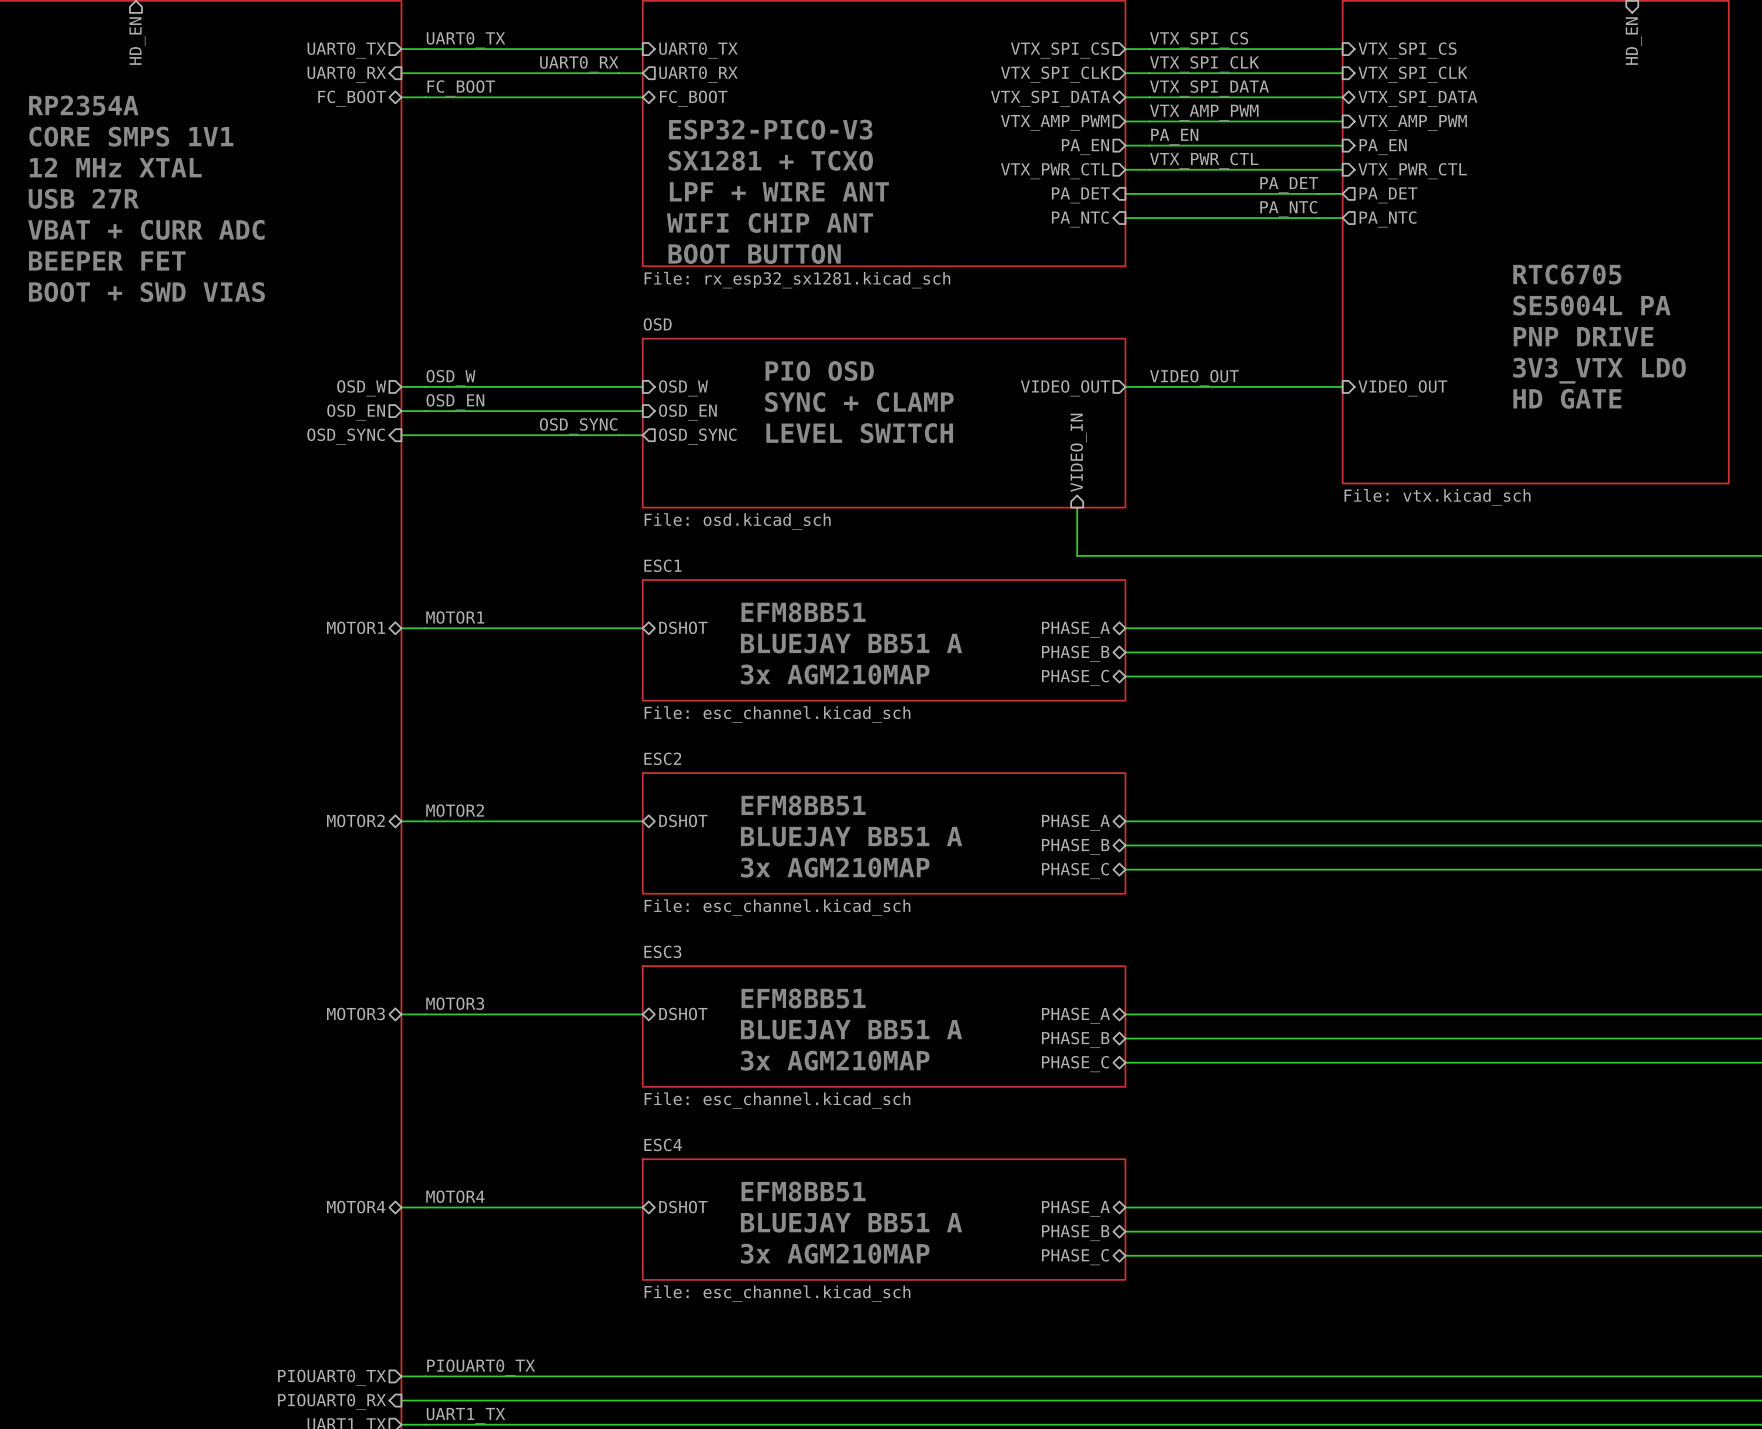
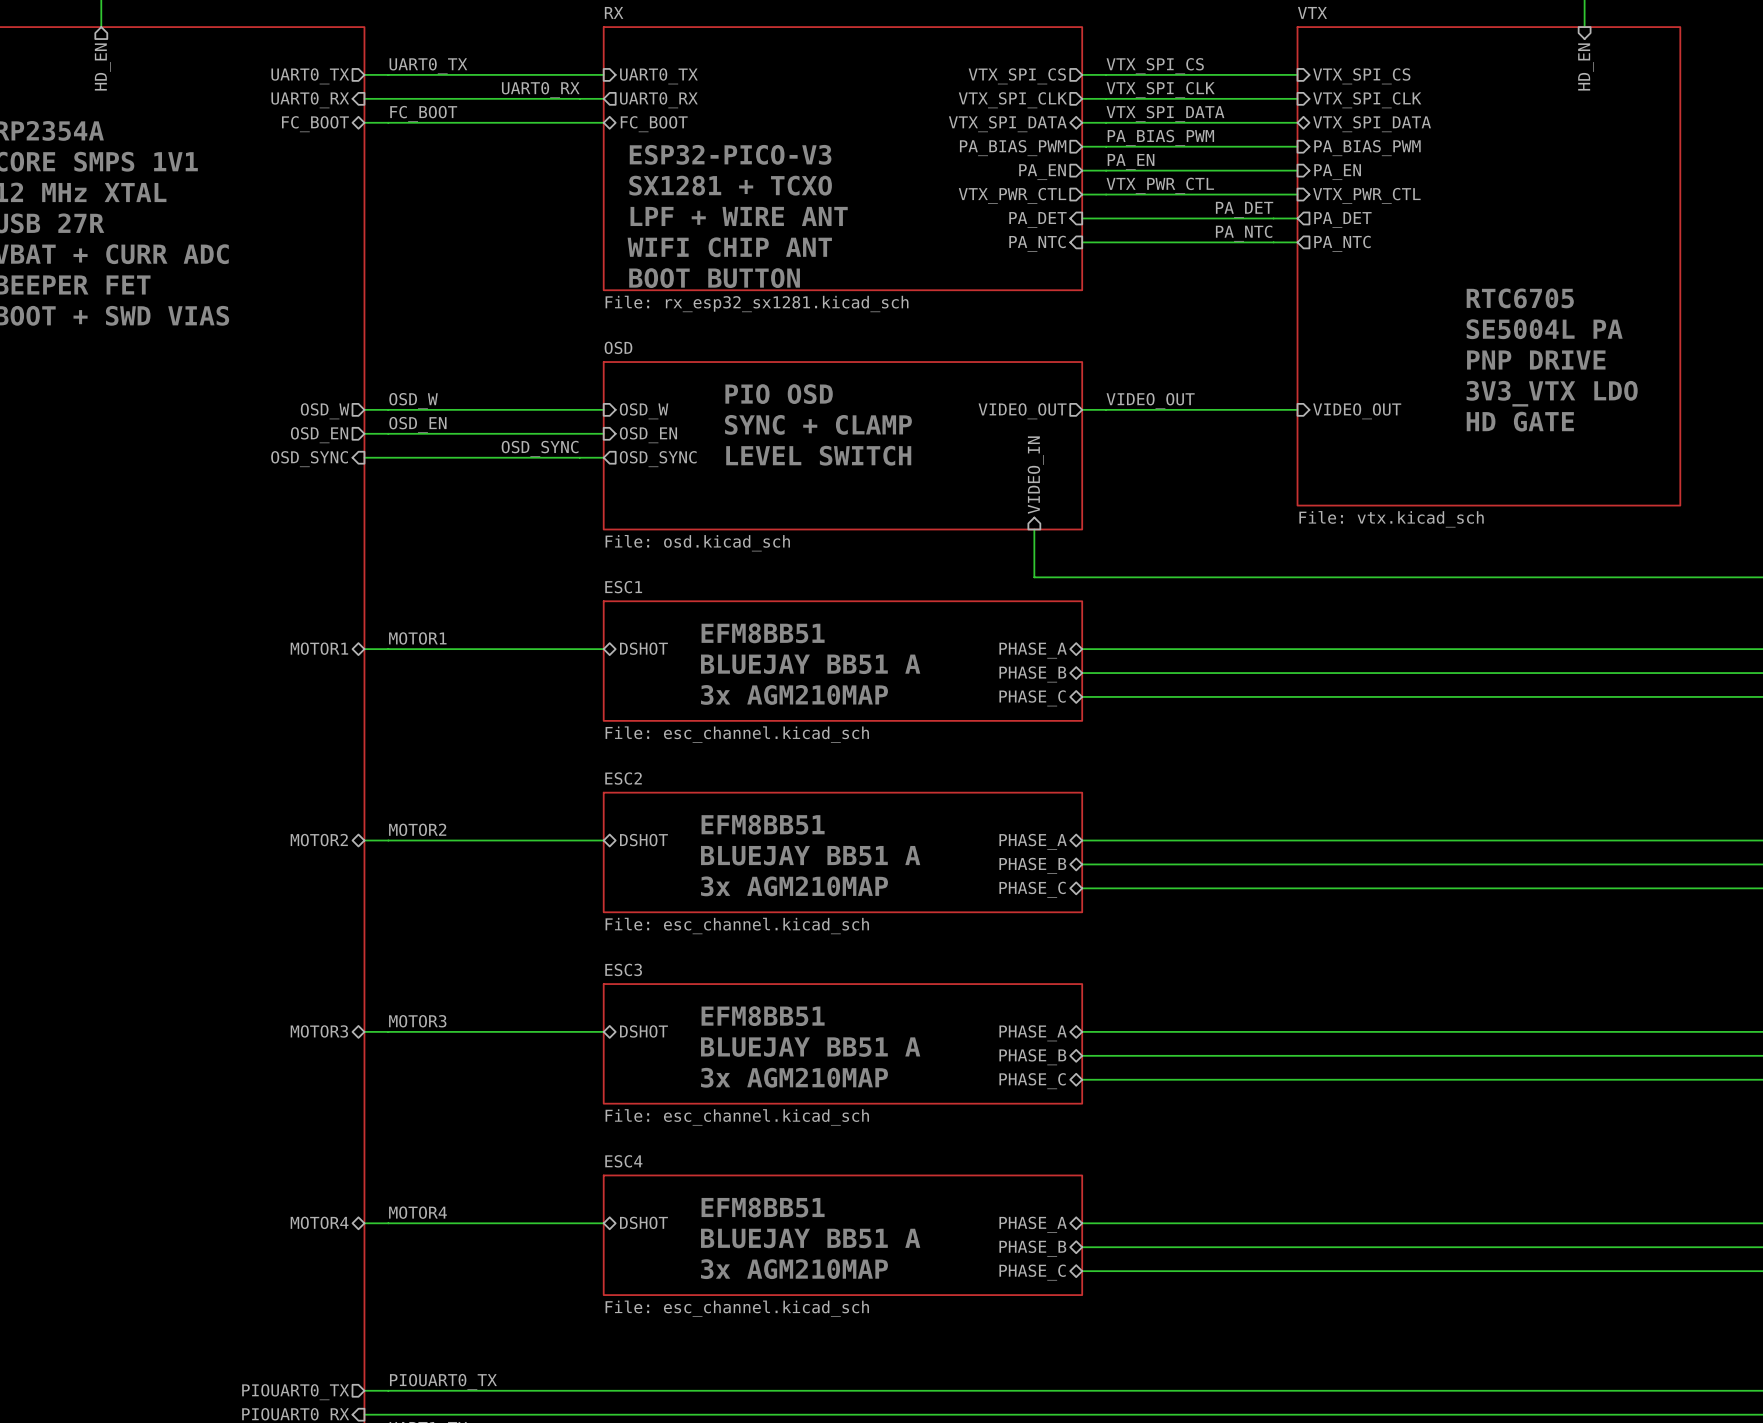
label: VTX_AMP_PWM (1204, 112) -> PA_BIAS_PWM (1160, 137)
sheet pin: VTX_AMP_PWM (1055, 122) -> PA_BIAS_PWM (1013, 148)
sheet pin: VTX_AMP_PWM (1412, 122) -> PA_BIAS_PWM (1367, 148)

